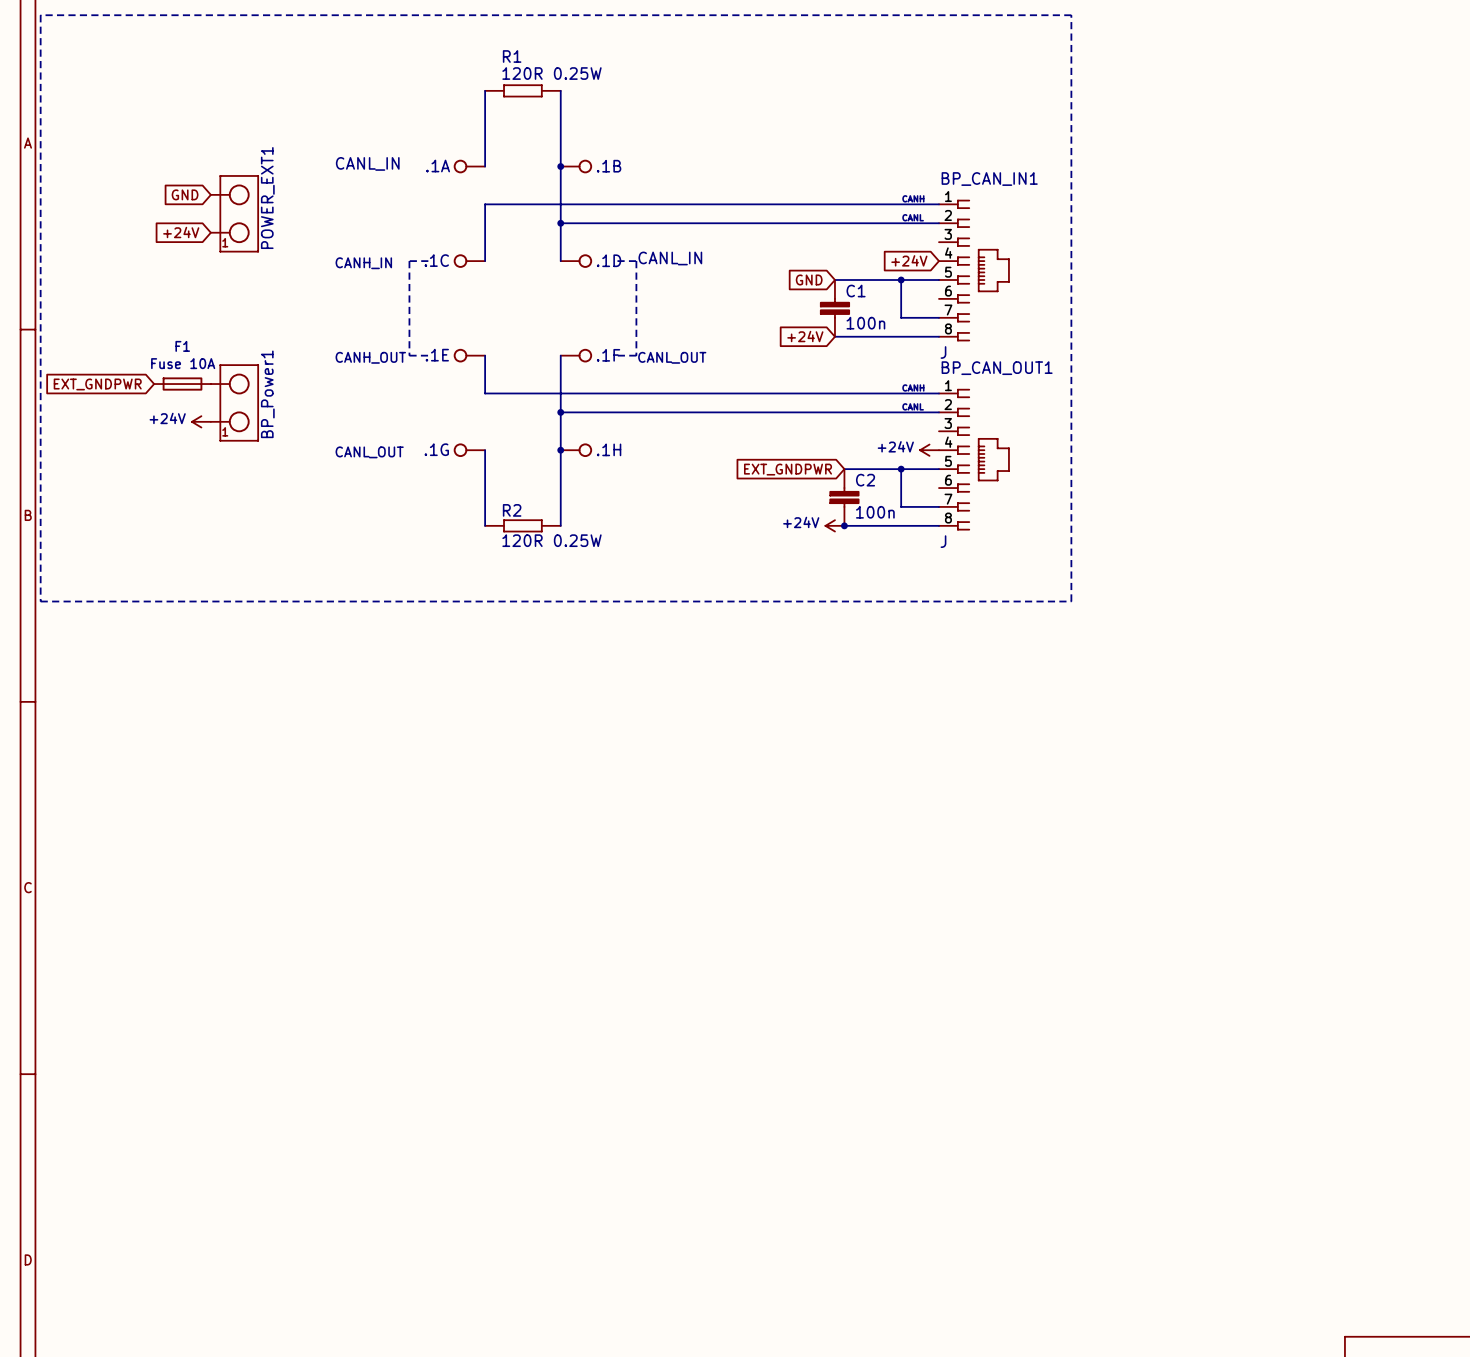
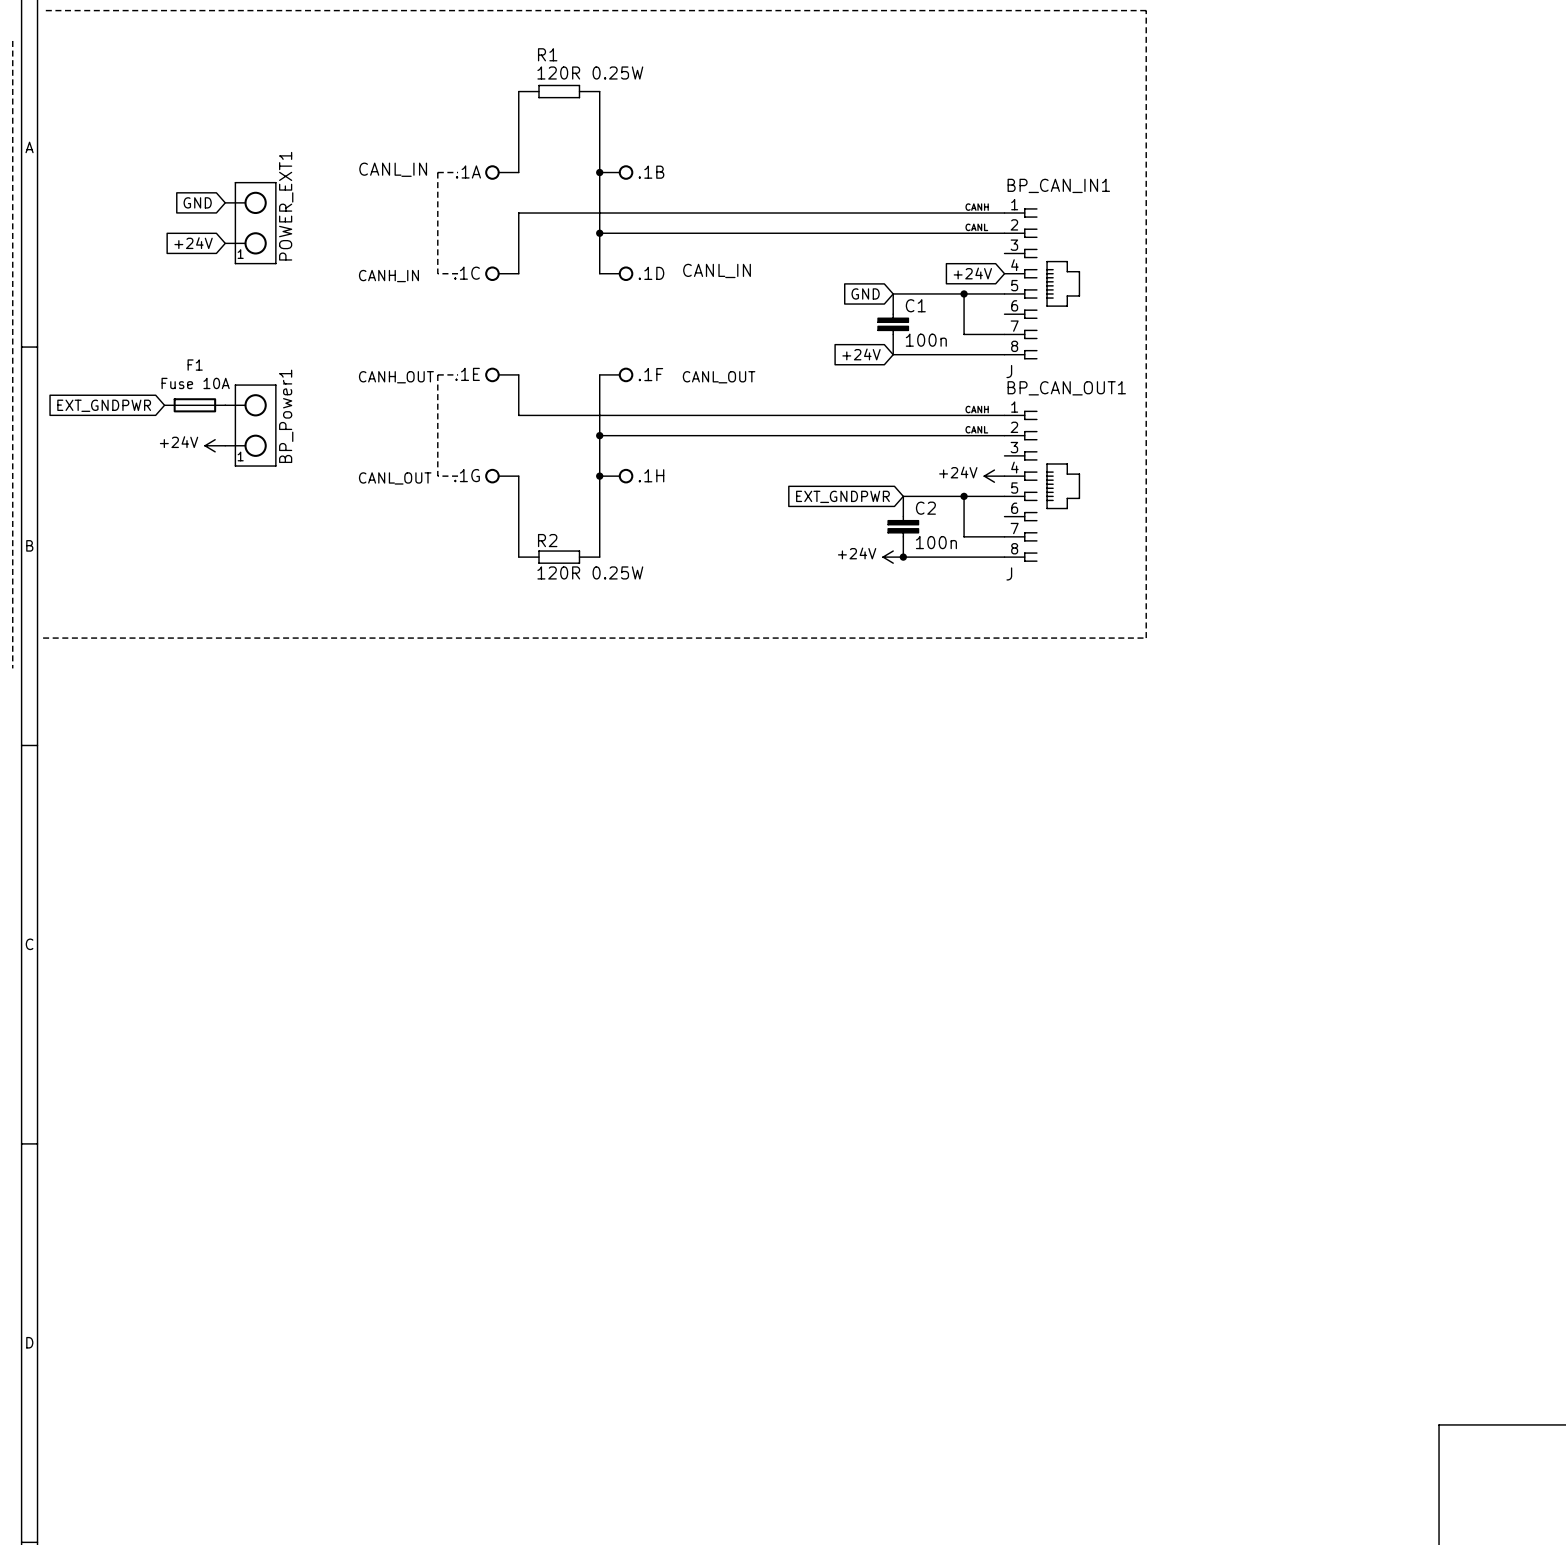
line: (40, 15) (40, 601) -> (12, 40) (12, 668)
line: (409, 261) (409, 355) -> (437, 273) (437, 172) (458, 172)
line: (617, 261) (636, 261) (636, 355) (617, 355) -> none
line: none -> (437, 374) (437, 476) (458, 476)

